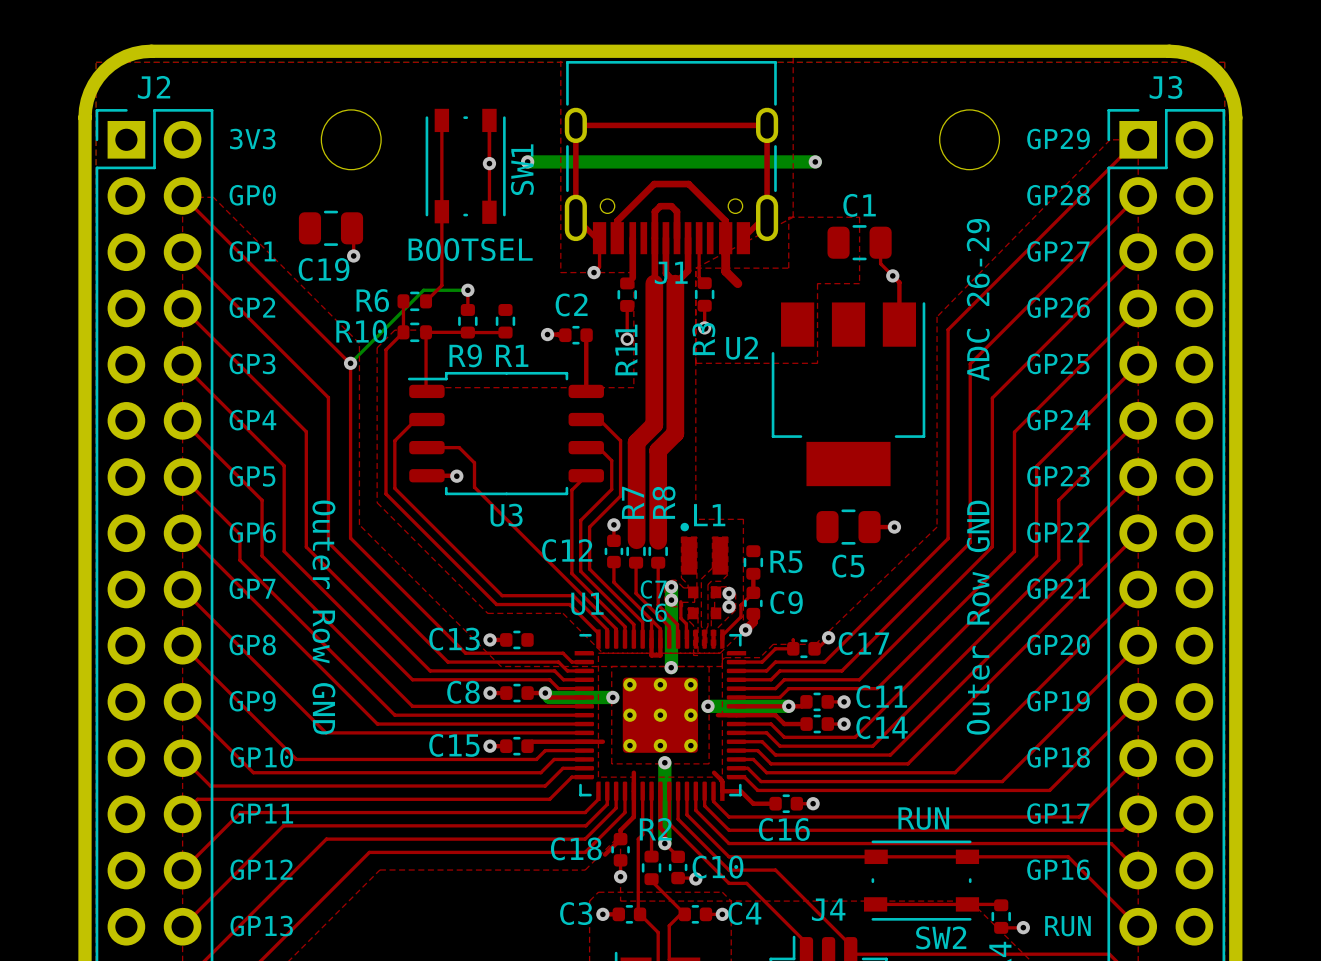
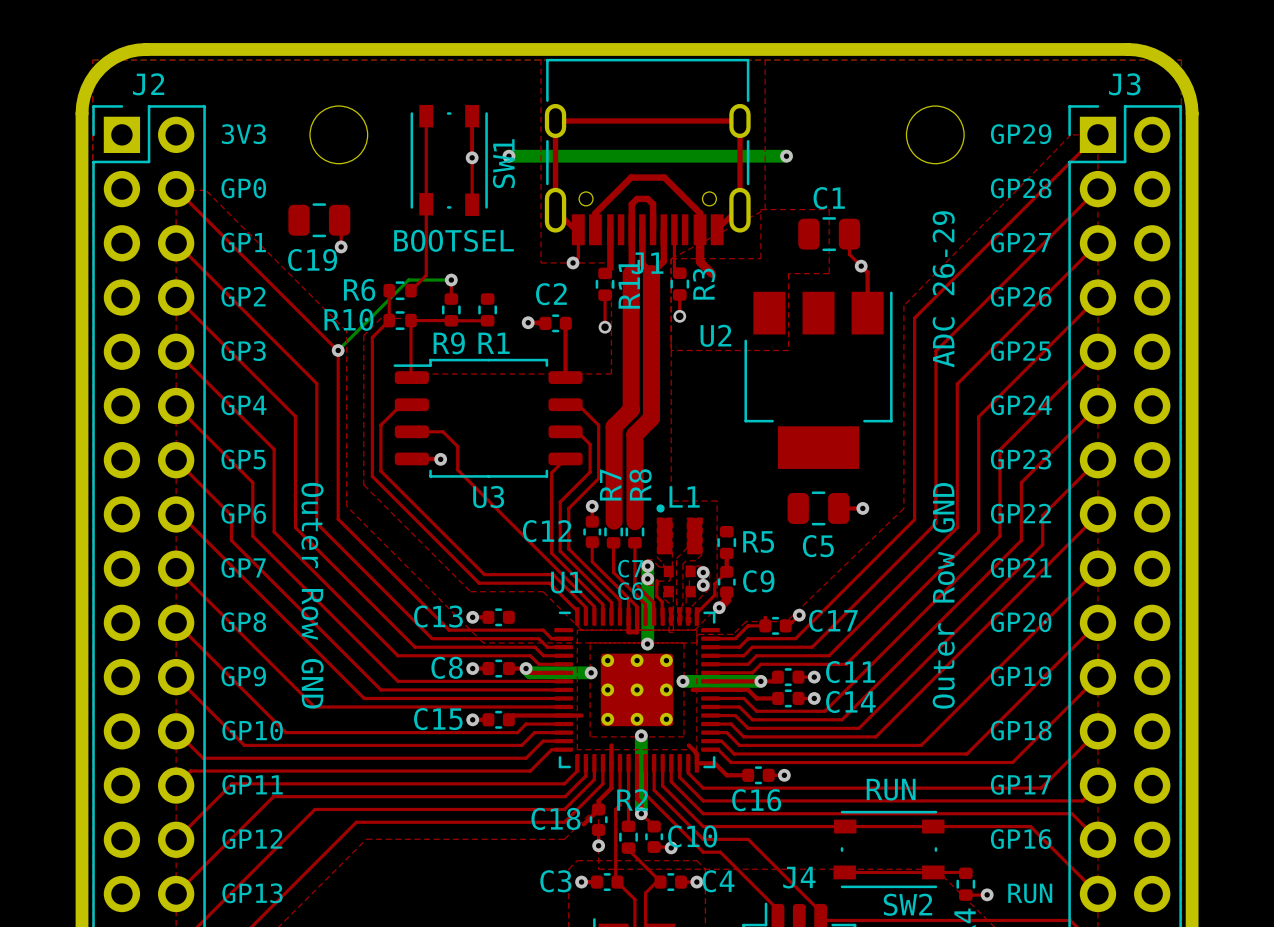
R3 name position: R3 (703, 339) -> R3 (703, 284)
R11 name position: R11 (626, 350) -> R11 (629, 284)

